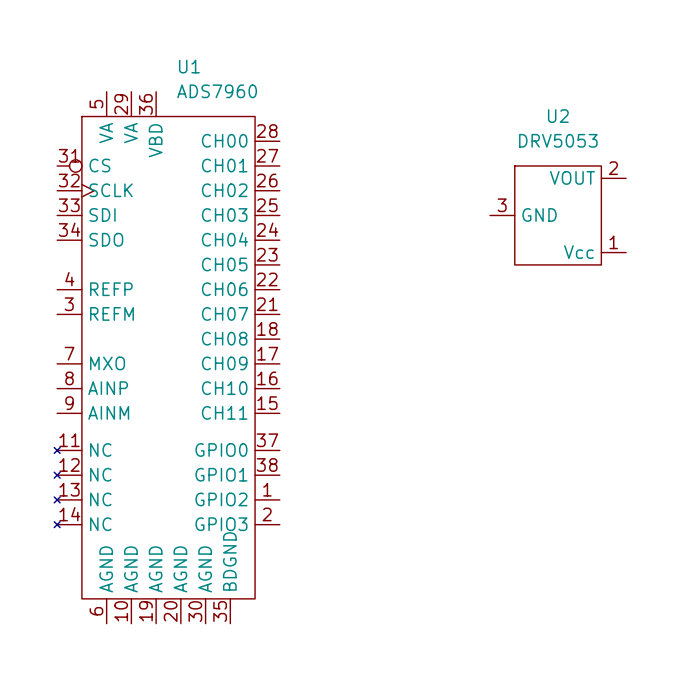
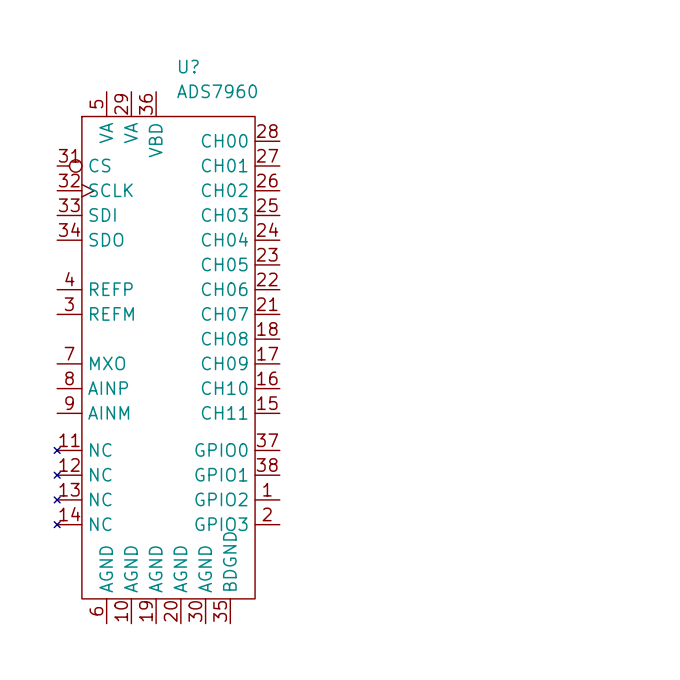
U1 name: U1 (189, 66) -> U? (188, 66)
U2: DRV5053 (558, 215) -> none

